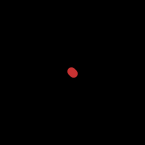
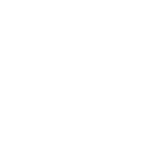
track: (71, 71) (73, 73) -> none

